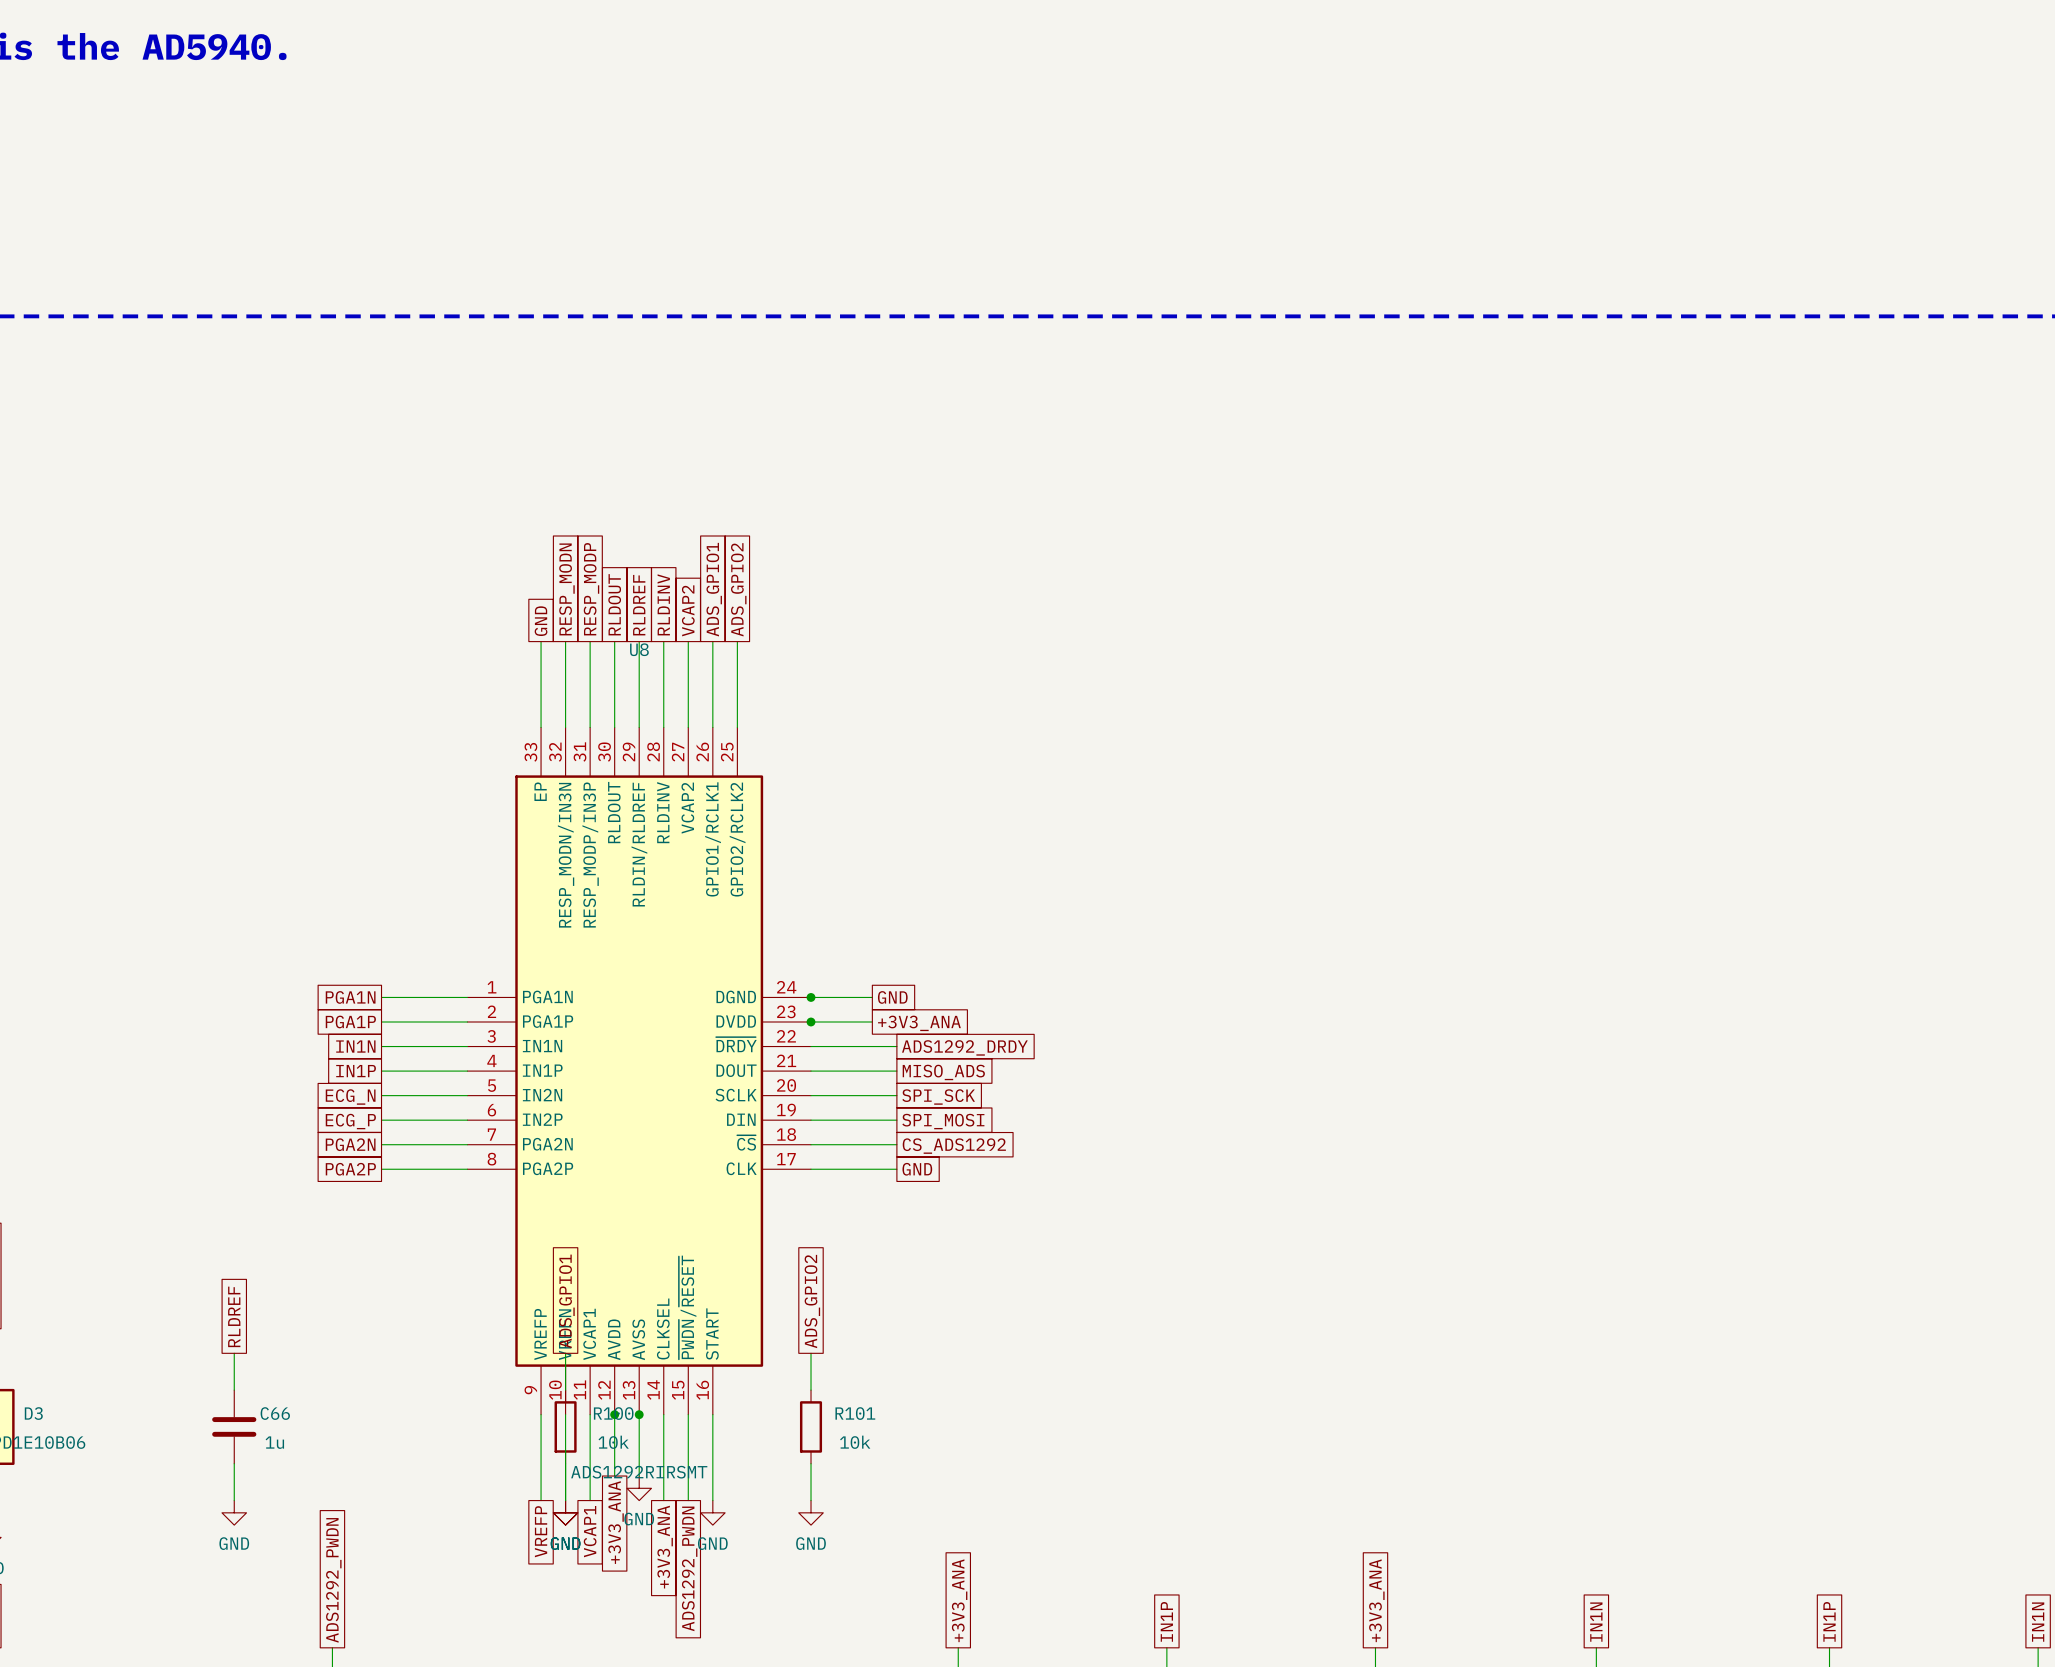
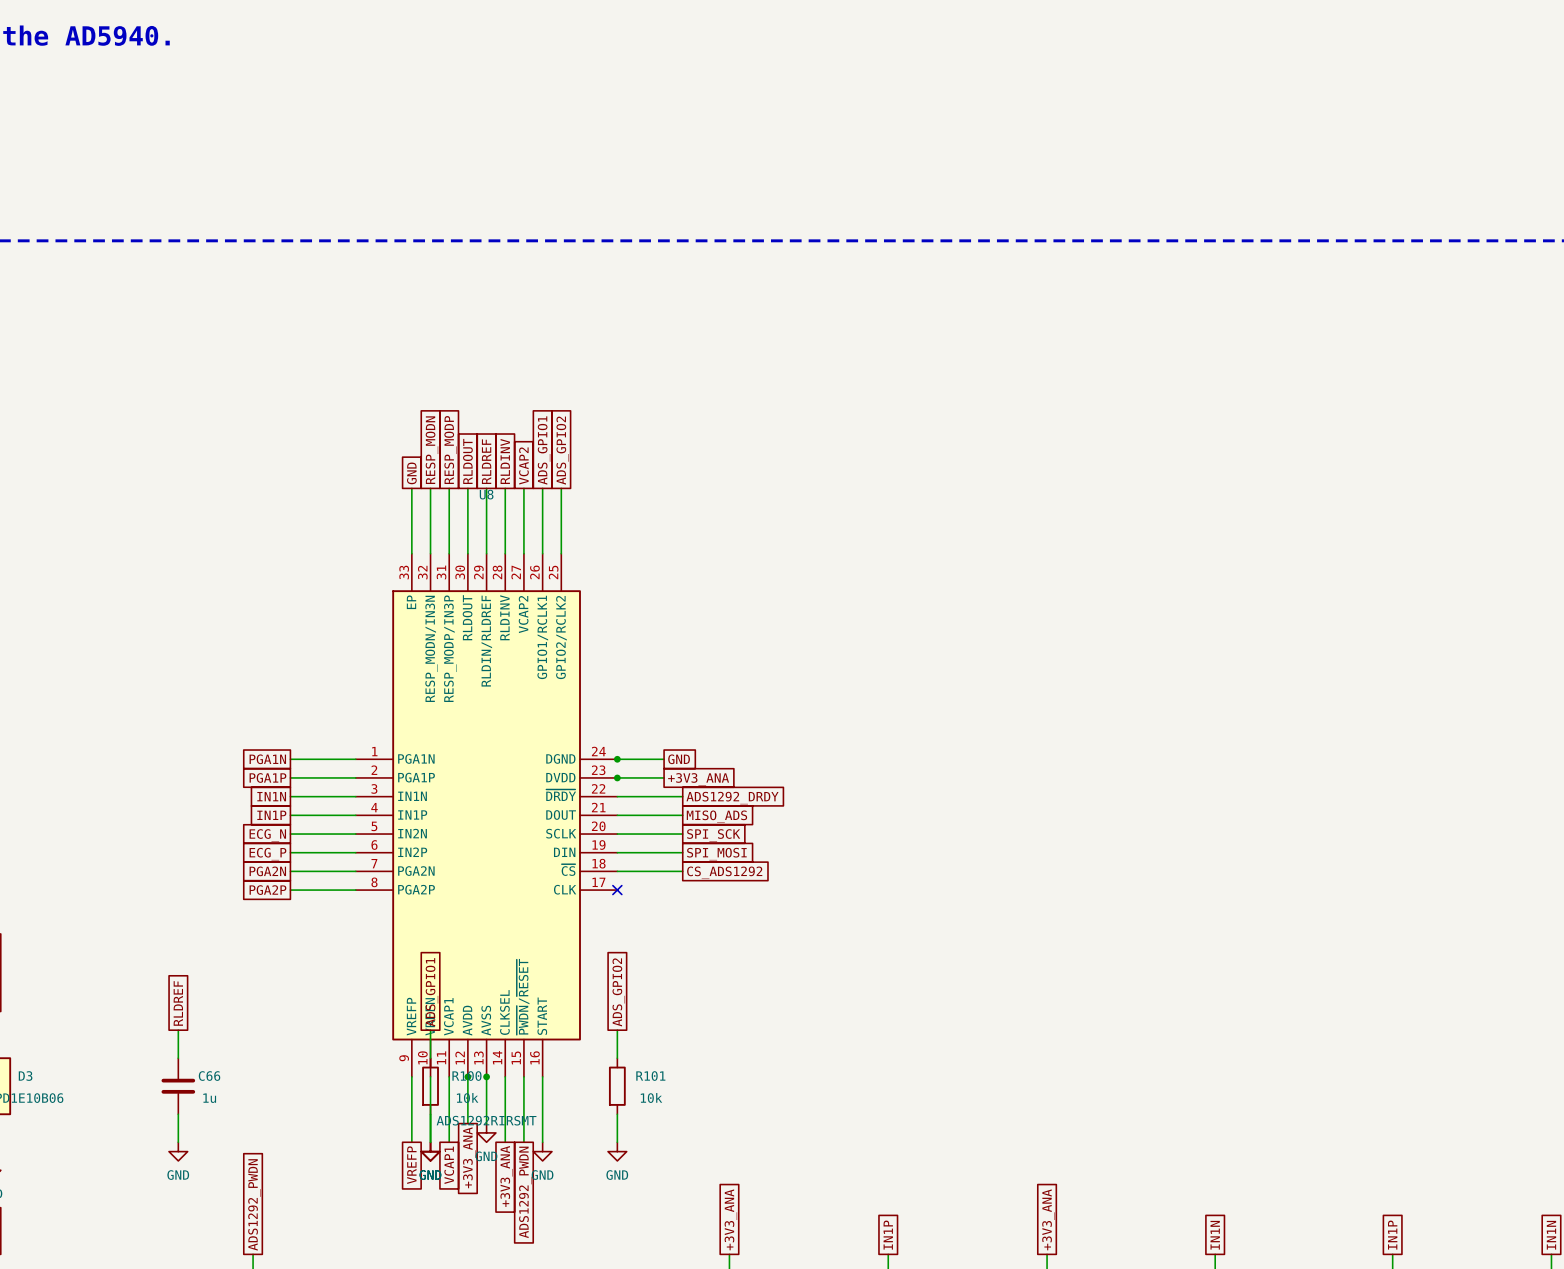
wire: (811, 1169) (896, 1169) -> none
no-connect mark: none -> (617, 890)
global label: GND (917, 1169) -> none

